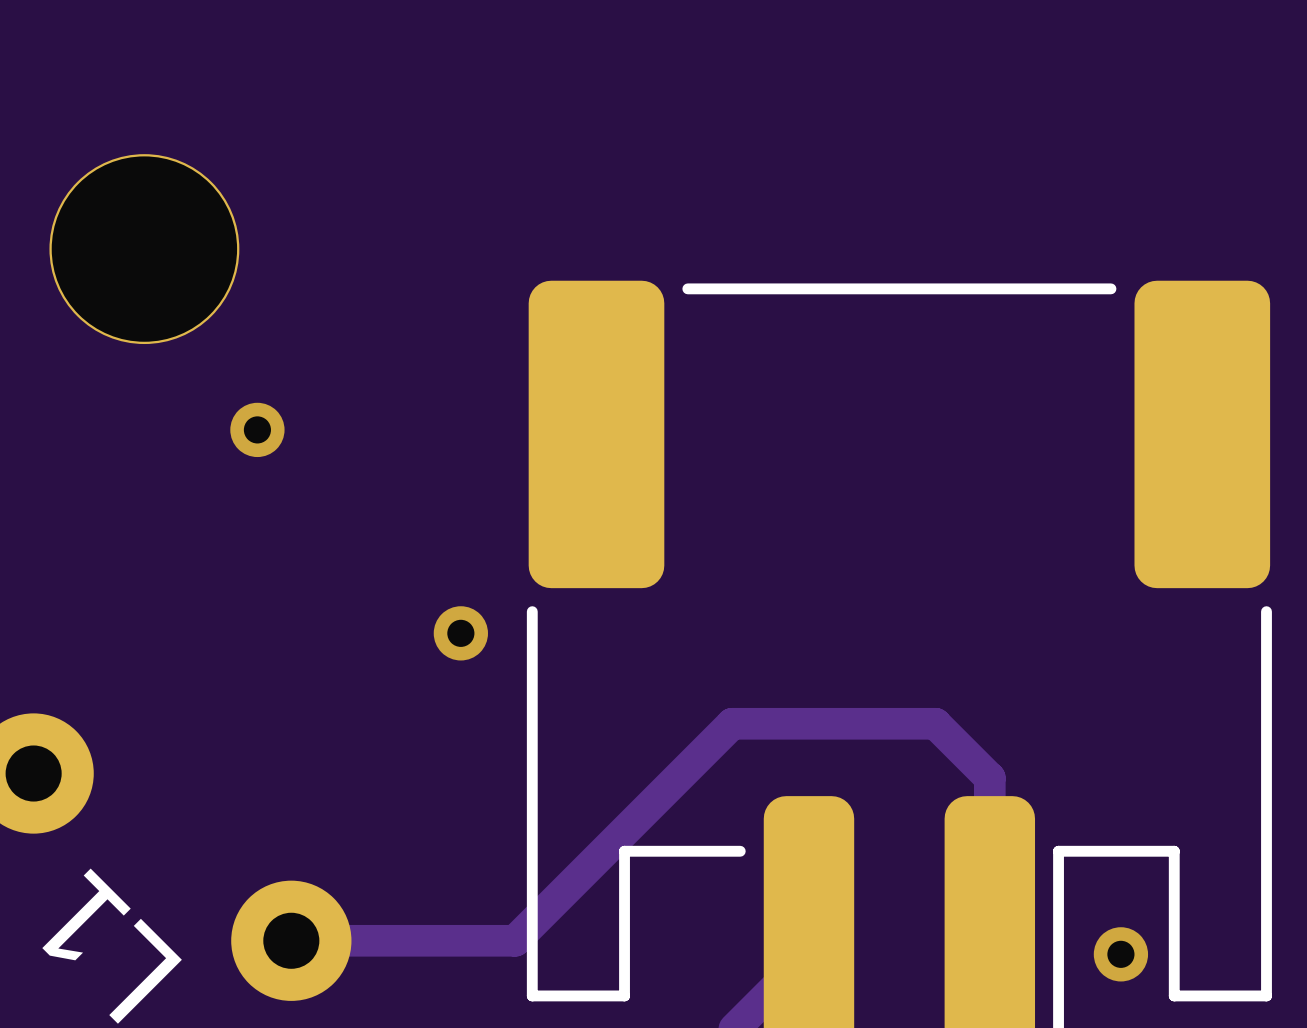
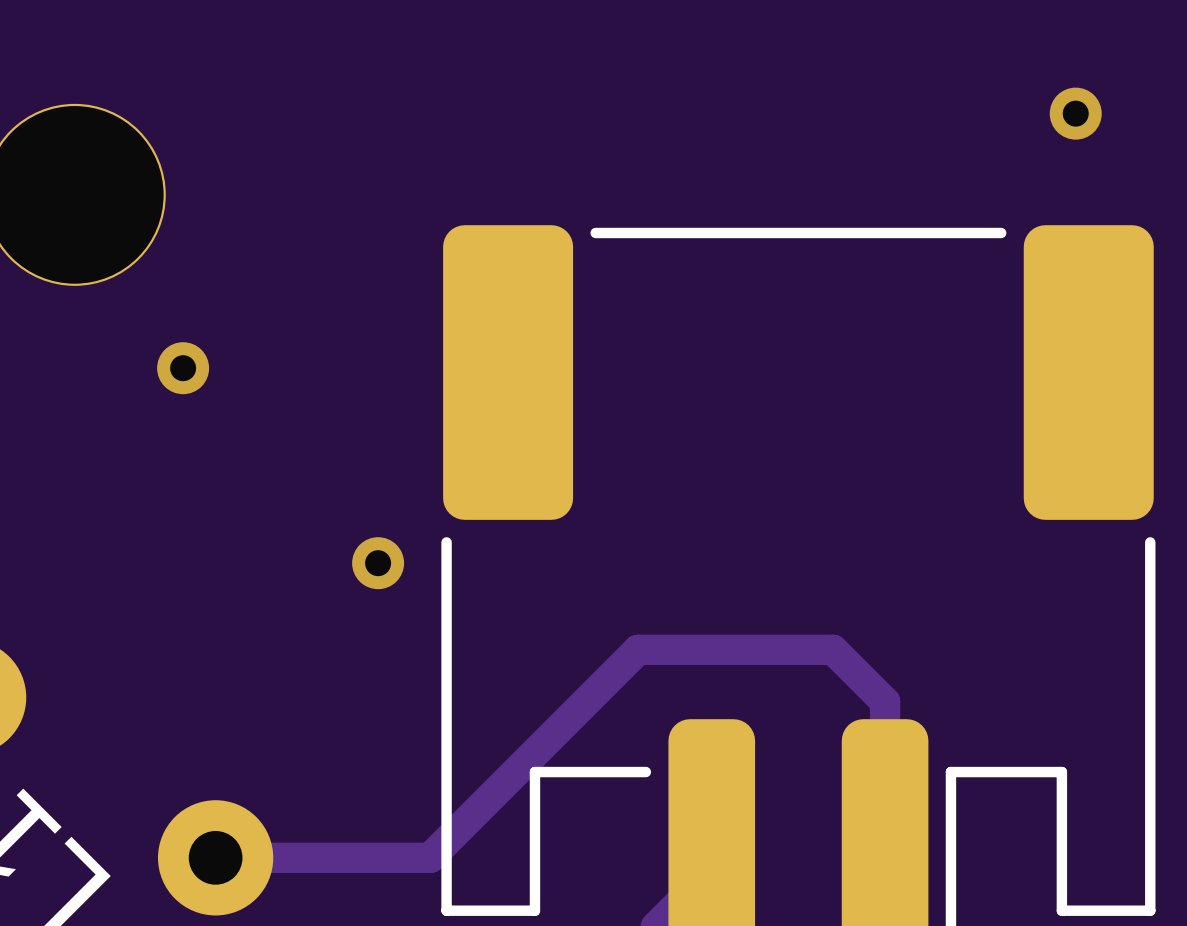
via: none -> (1075, 113)
via: (1120, 954) -> none

